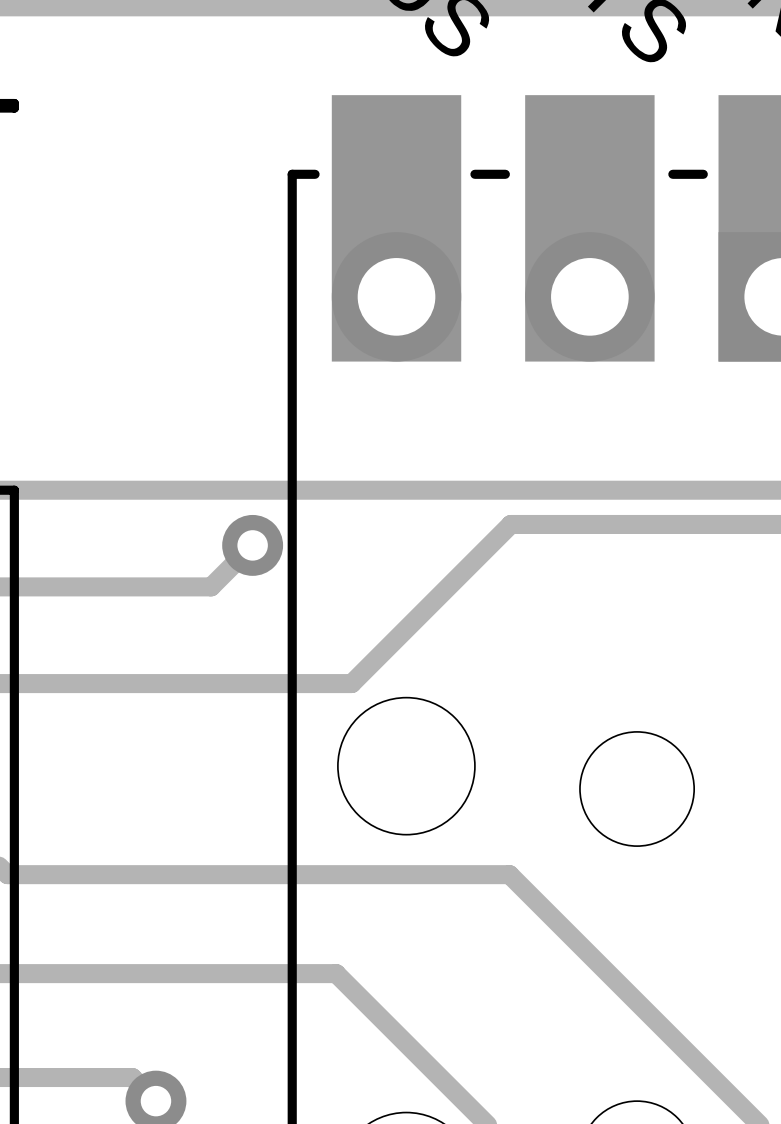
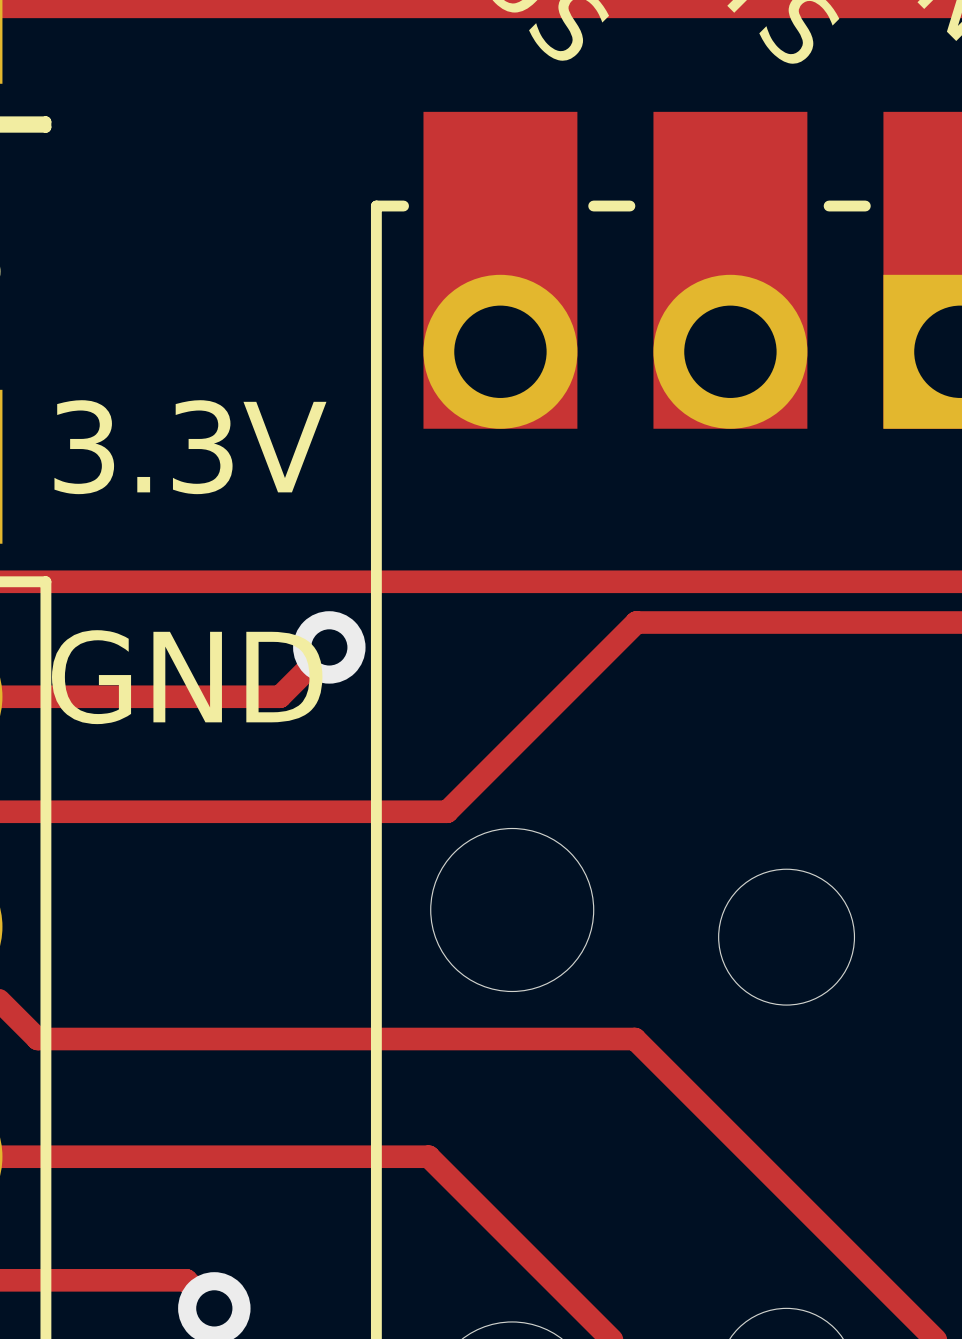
text: none -> 3.3V (190, 447)
text: none -> GND (187, 677)

